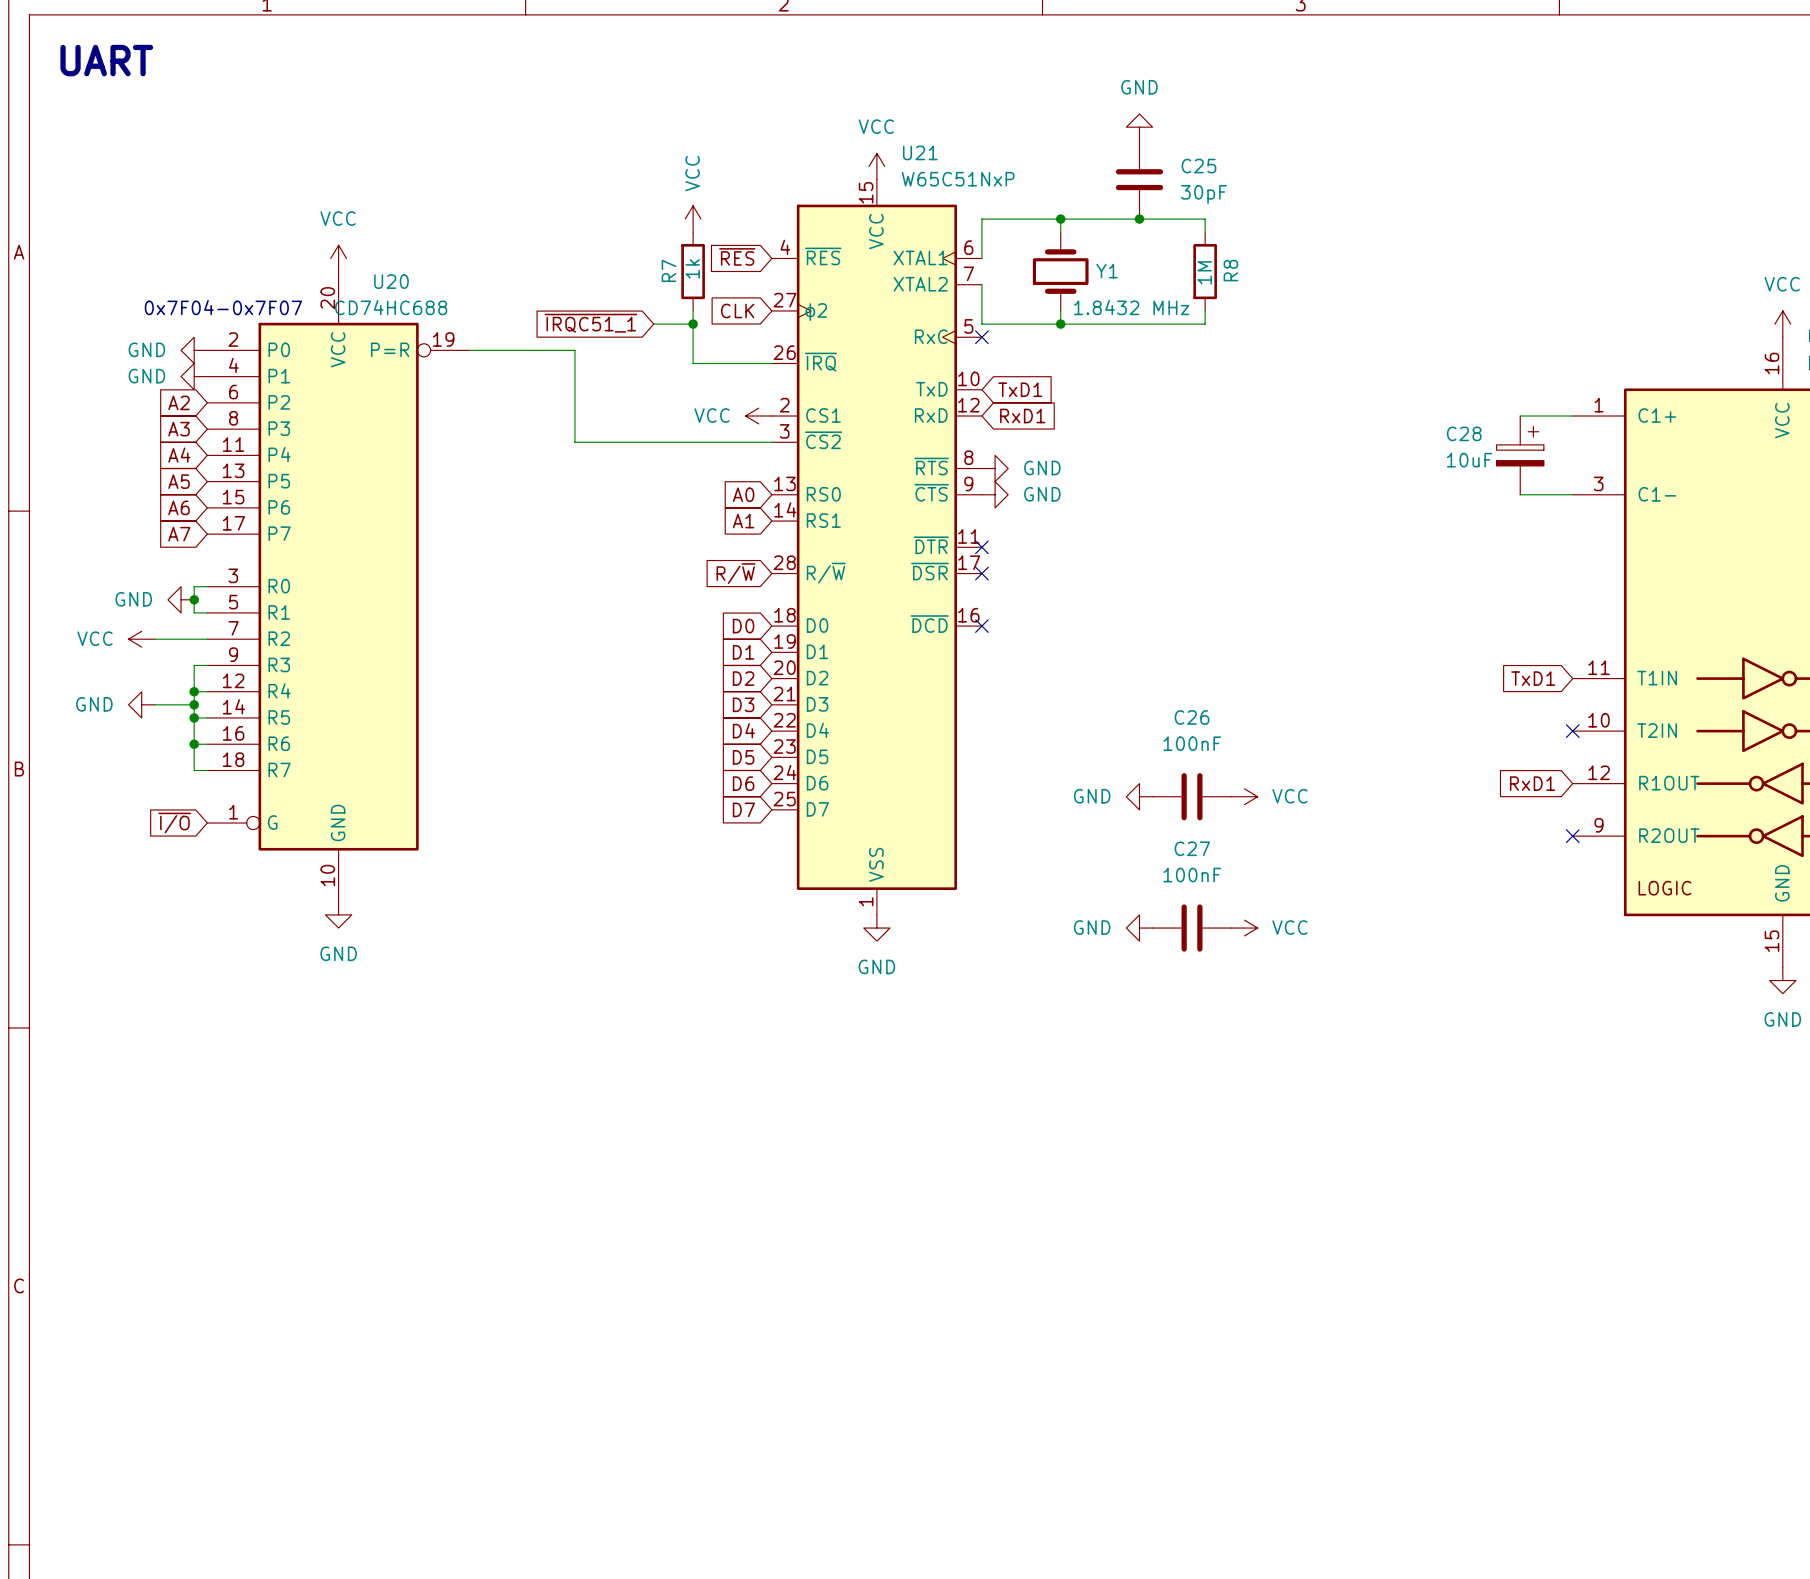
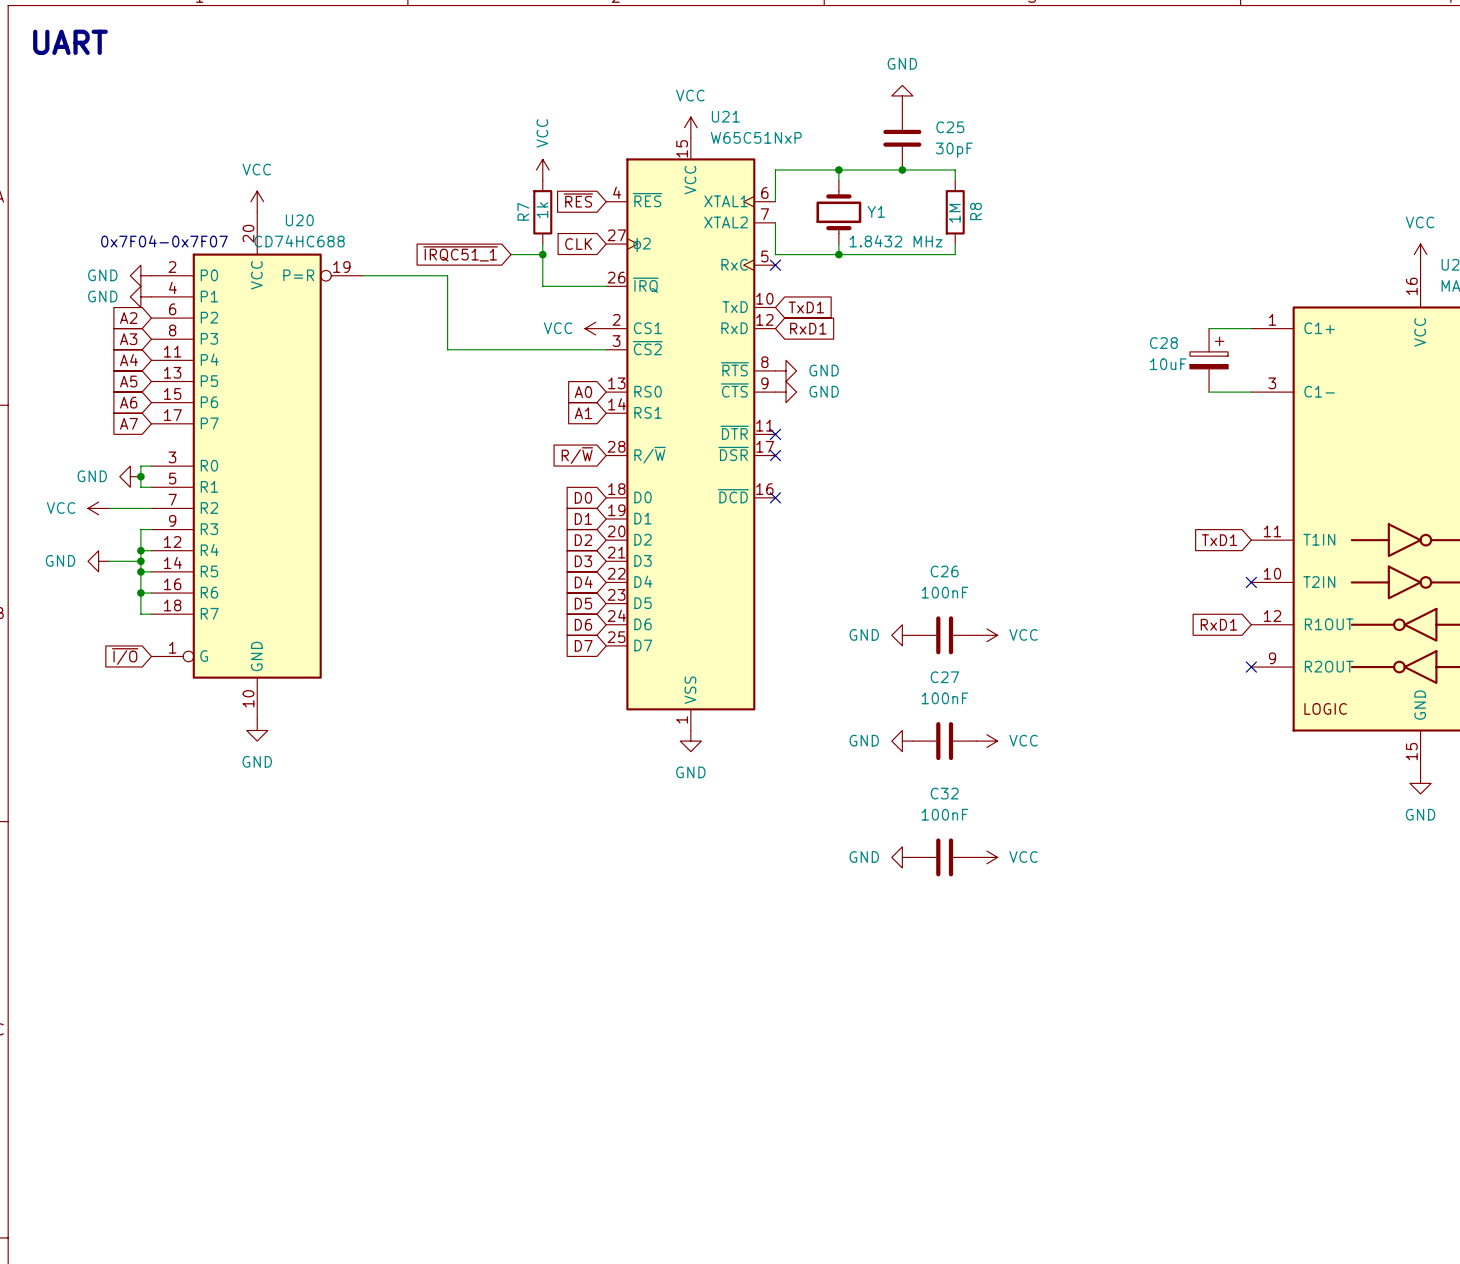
power symbol: none -> GND (902, 857)
C32: none -> 100nF (944, 857)
power symbol: none -> VCC (986, 857)

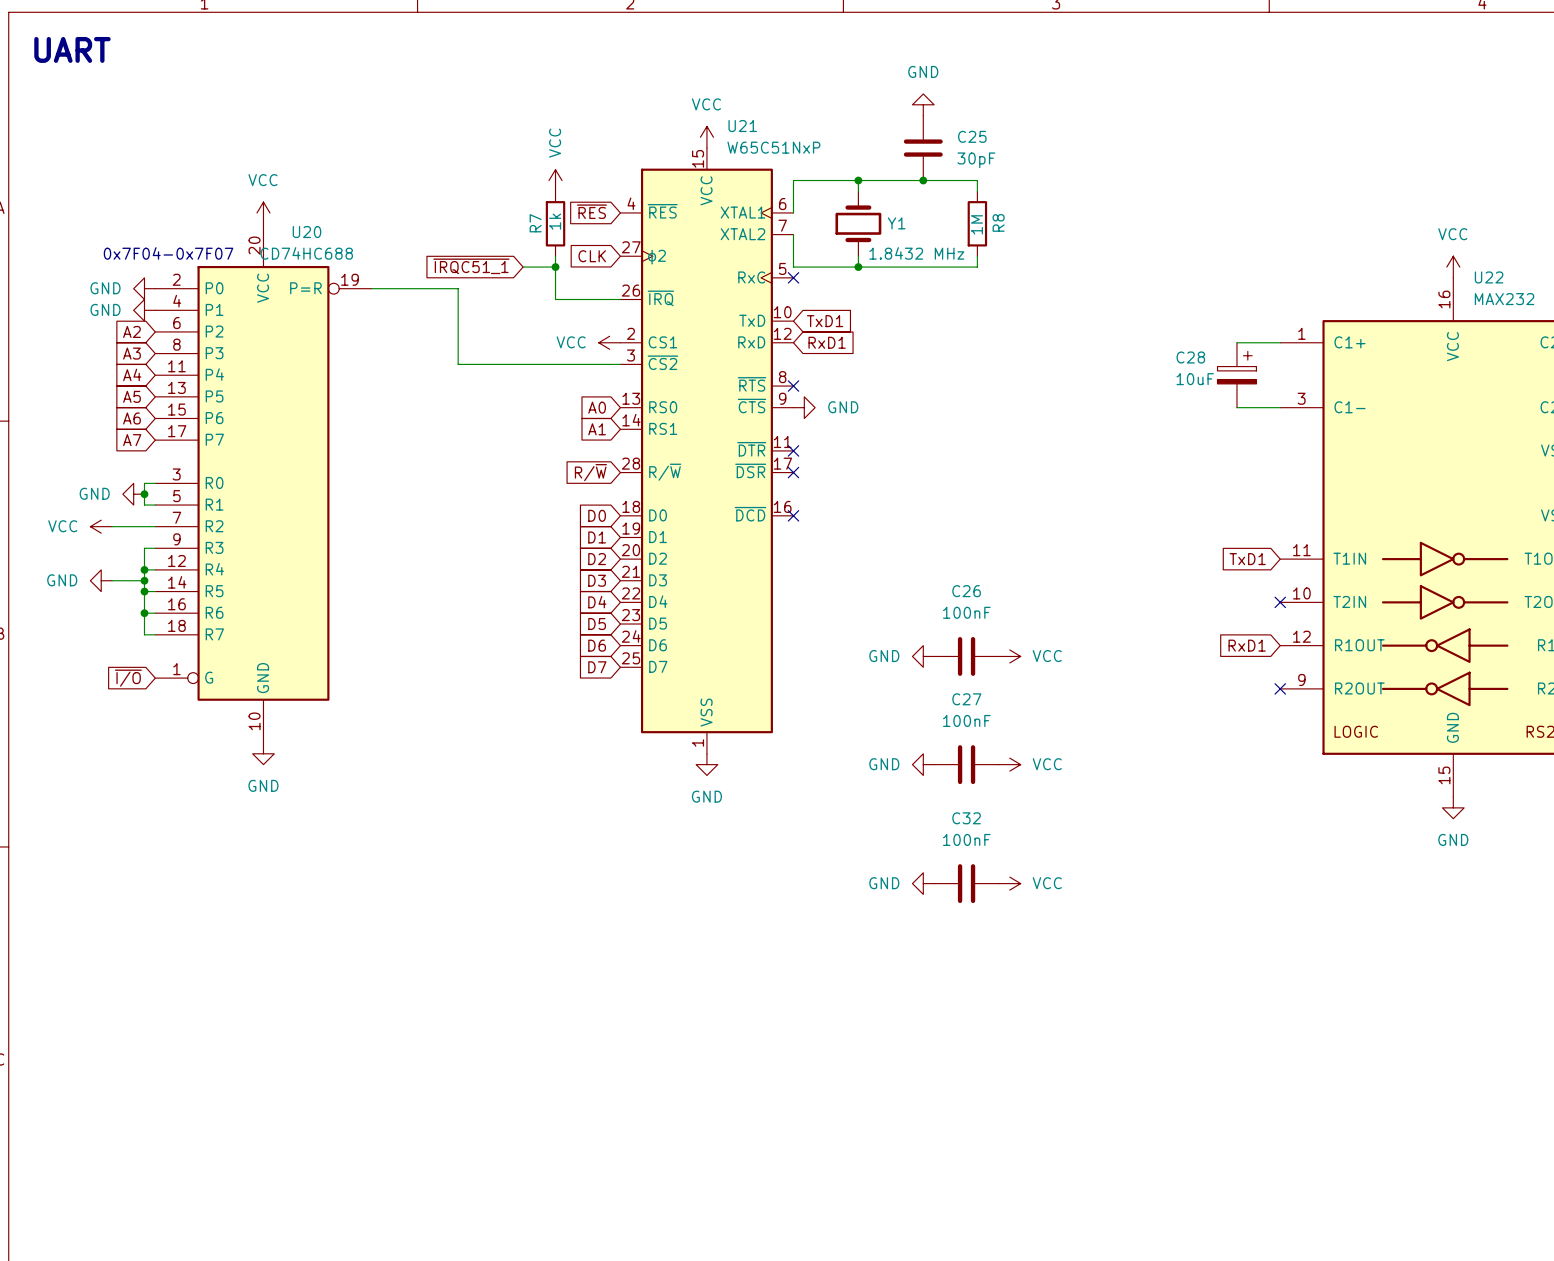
no-connect mark: none -> (793, 386)
power symbol: GND (786, 370) -> none

